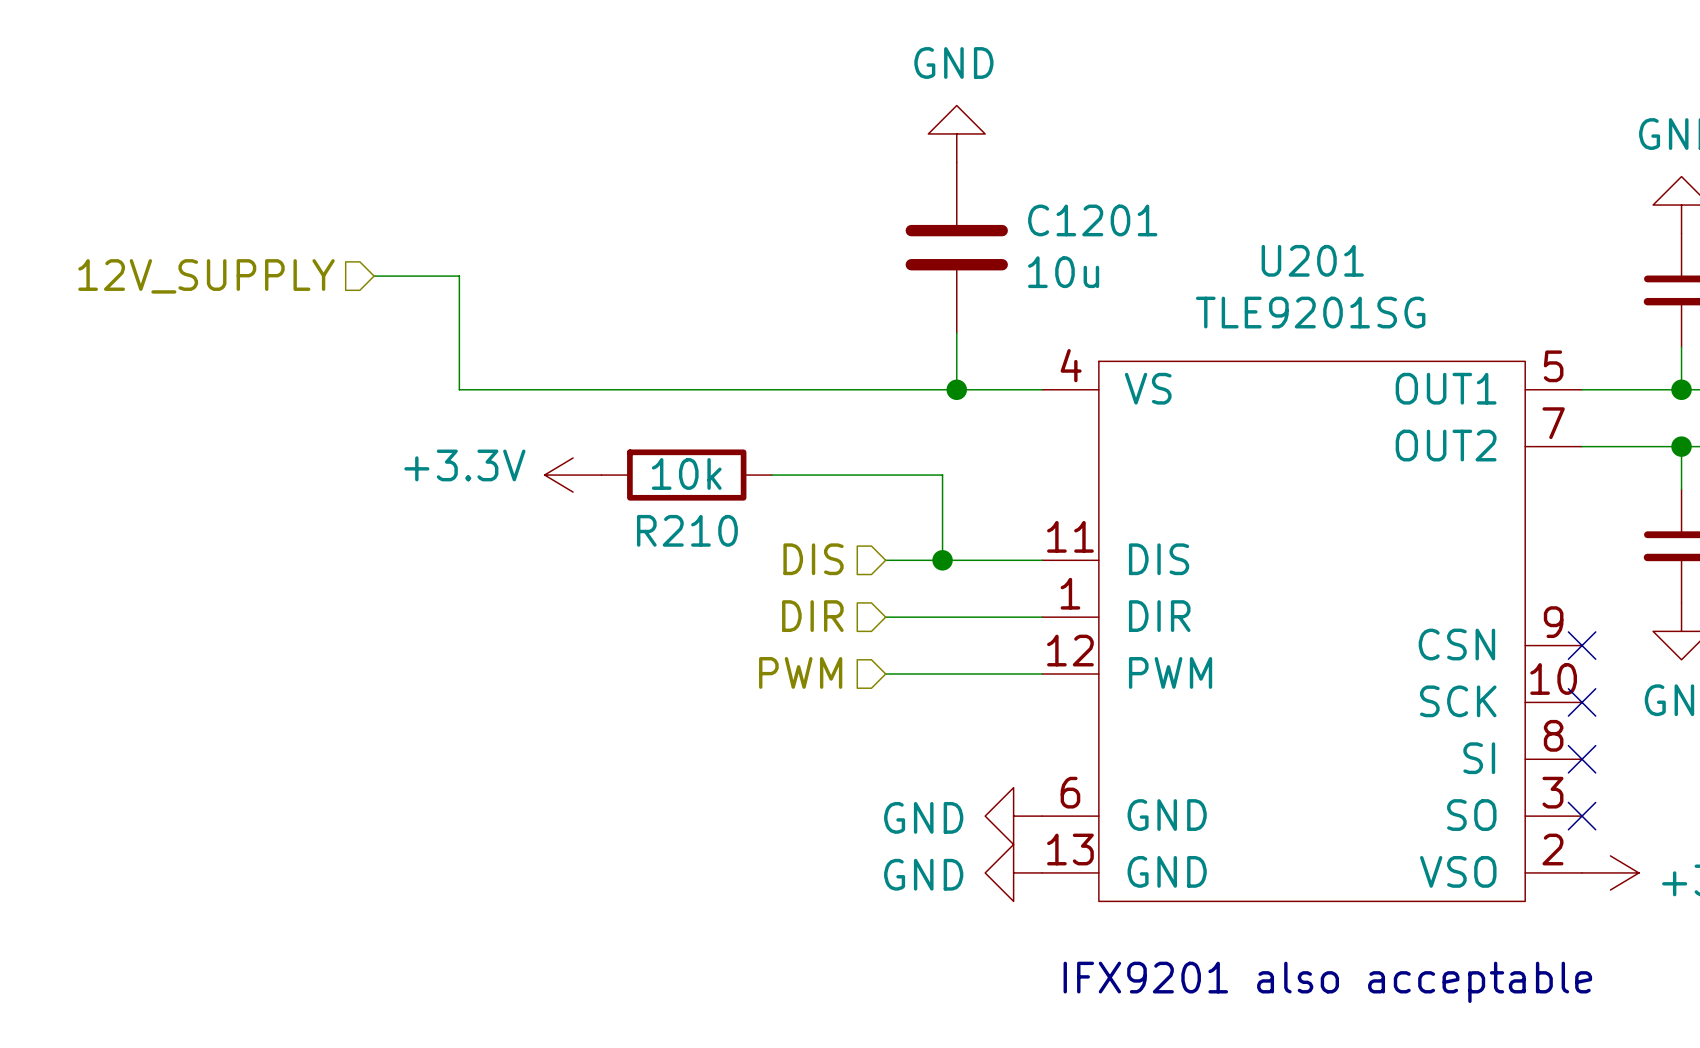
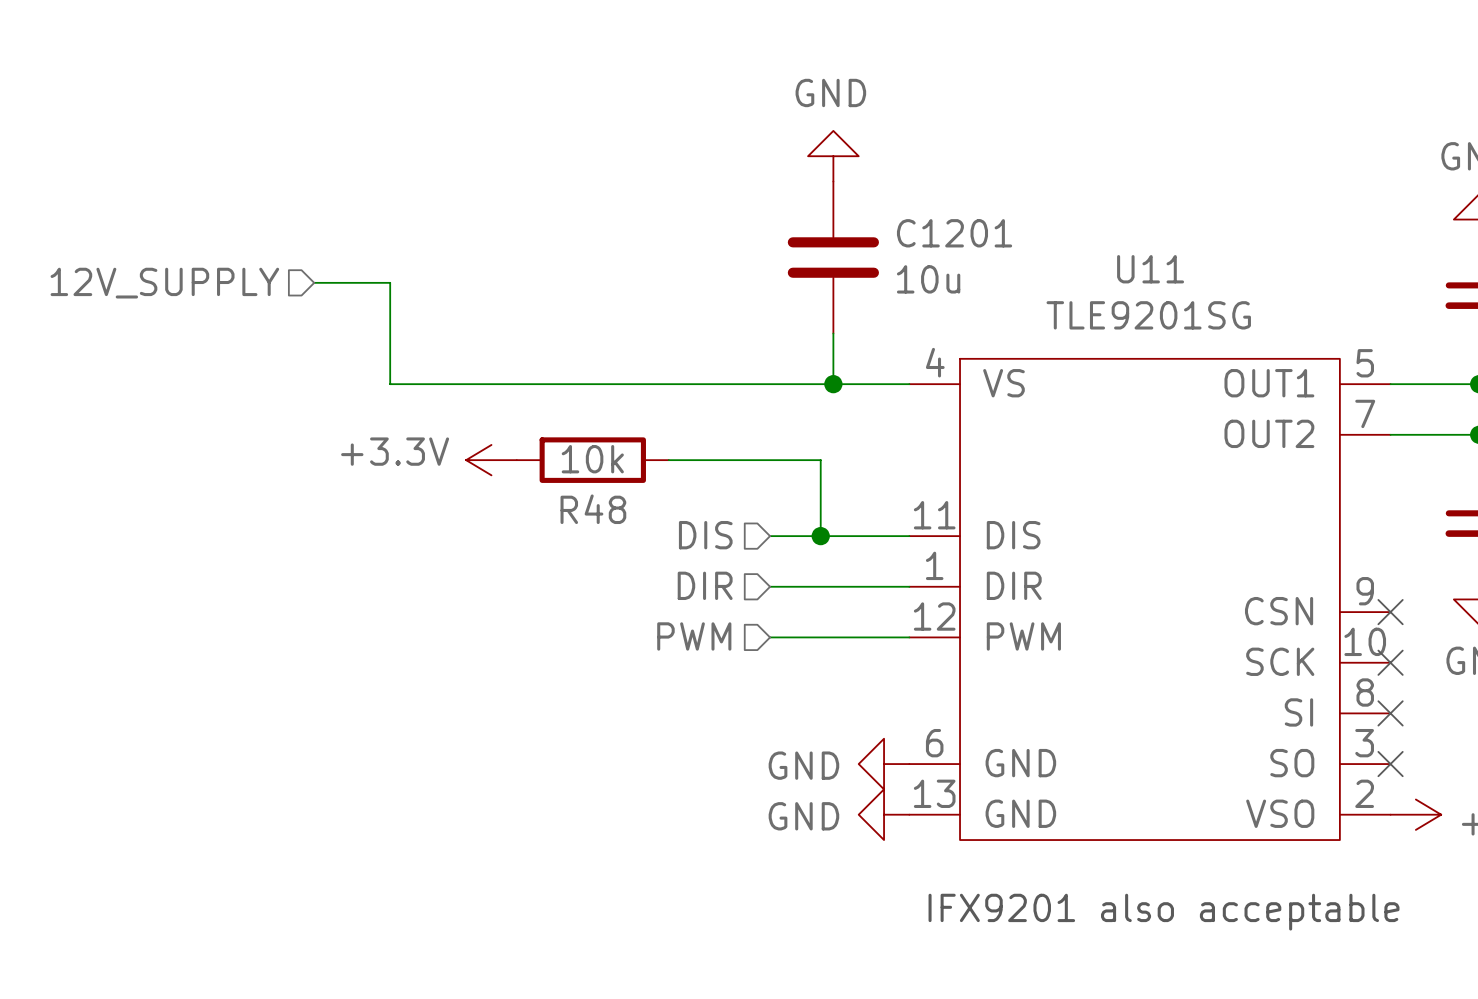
U201 name: U201 (1312, 260) -> U11 (1150, 269)
R210 name: R210 (687, 530) -> R48 (593, 509)

